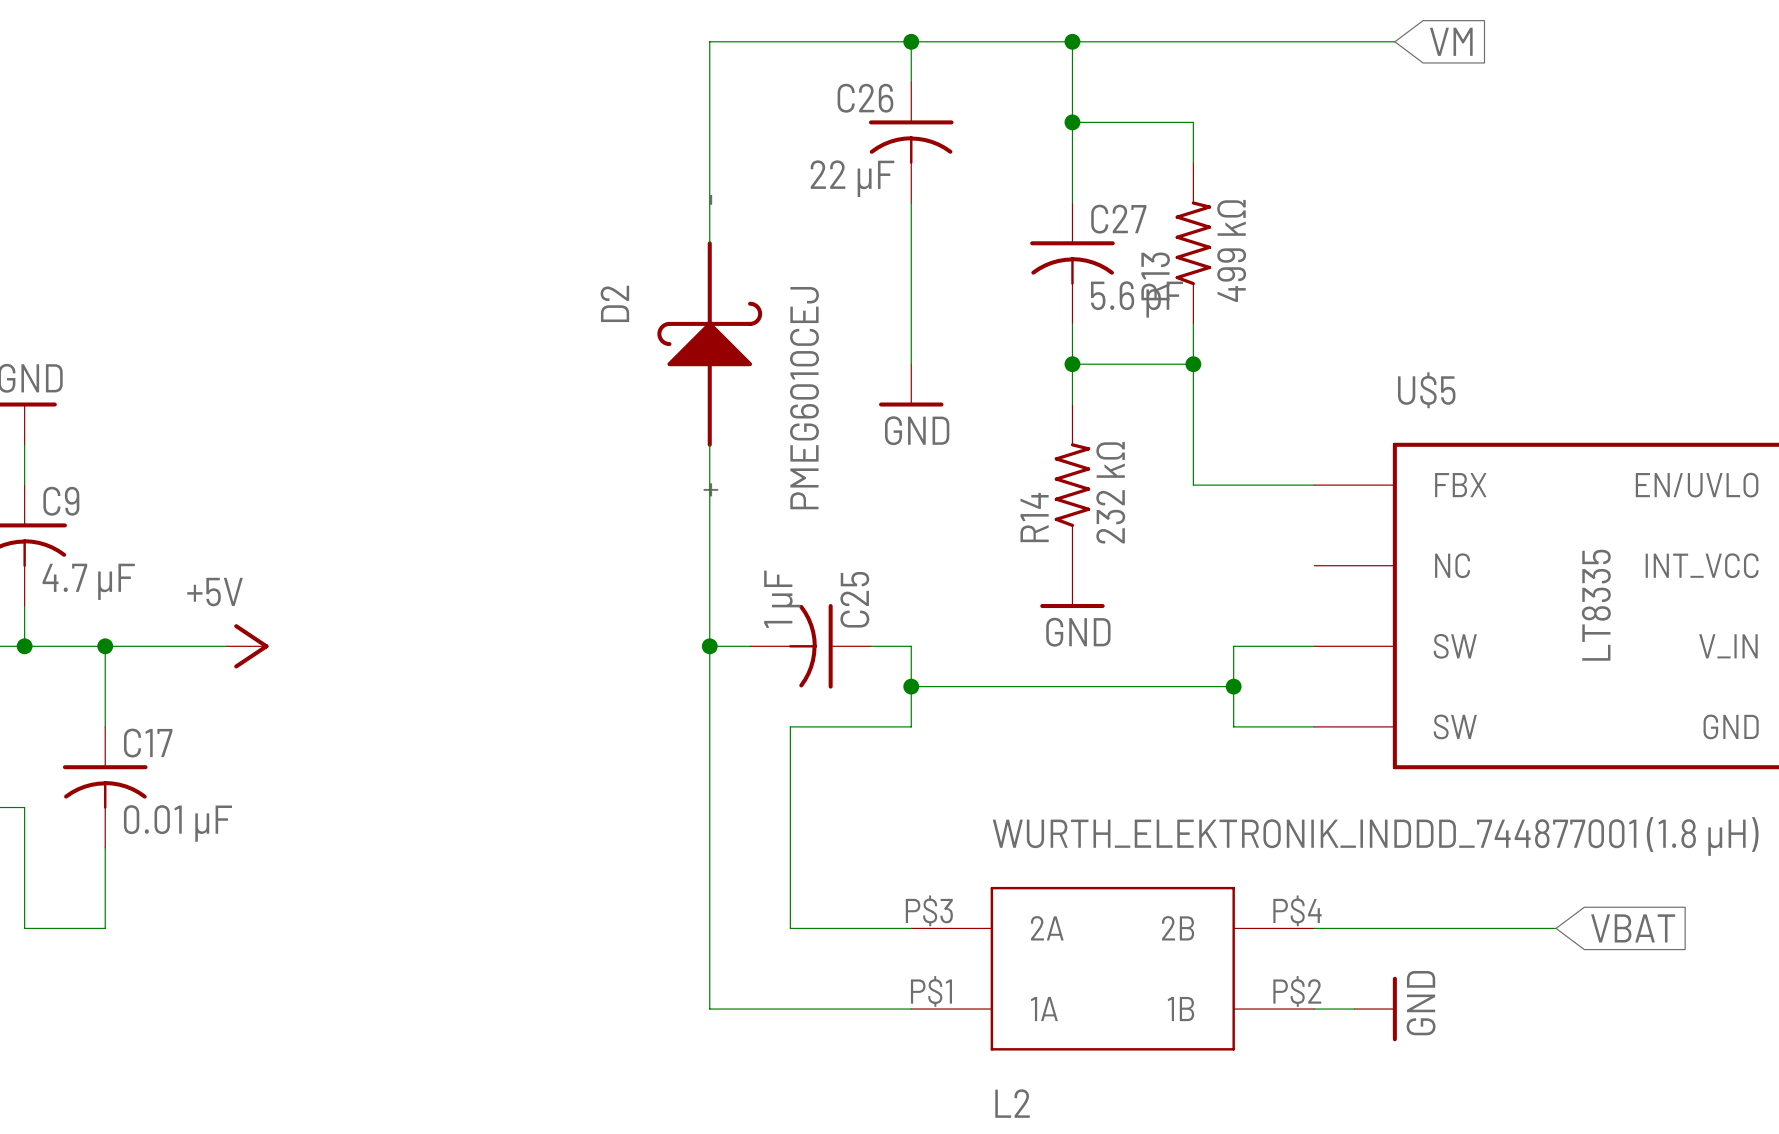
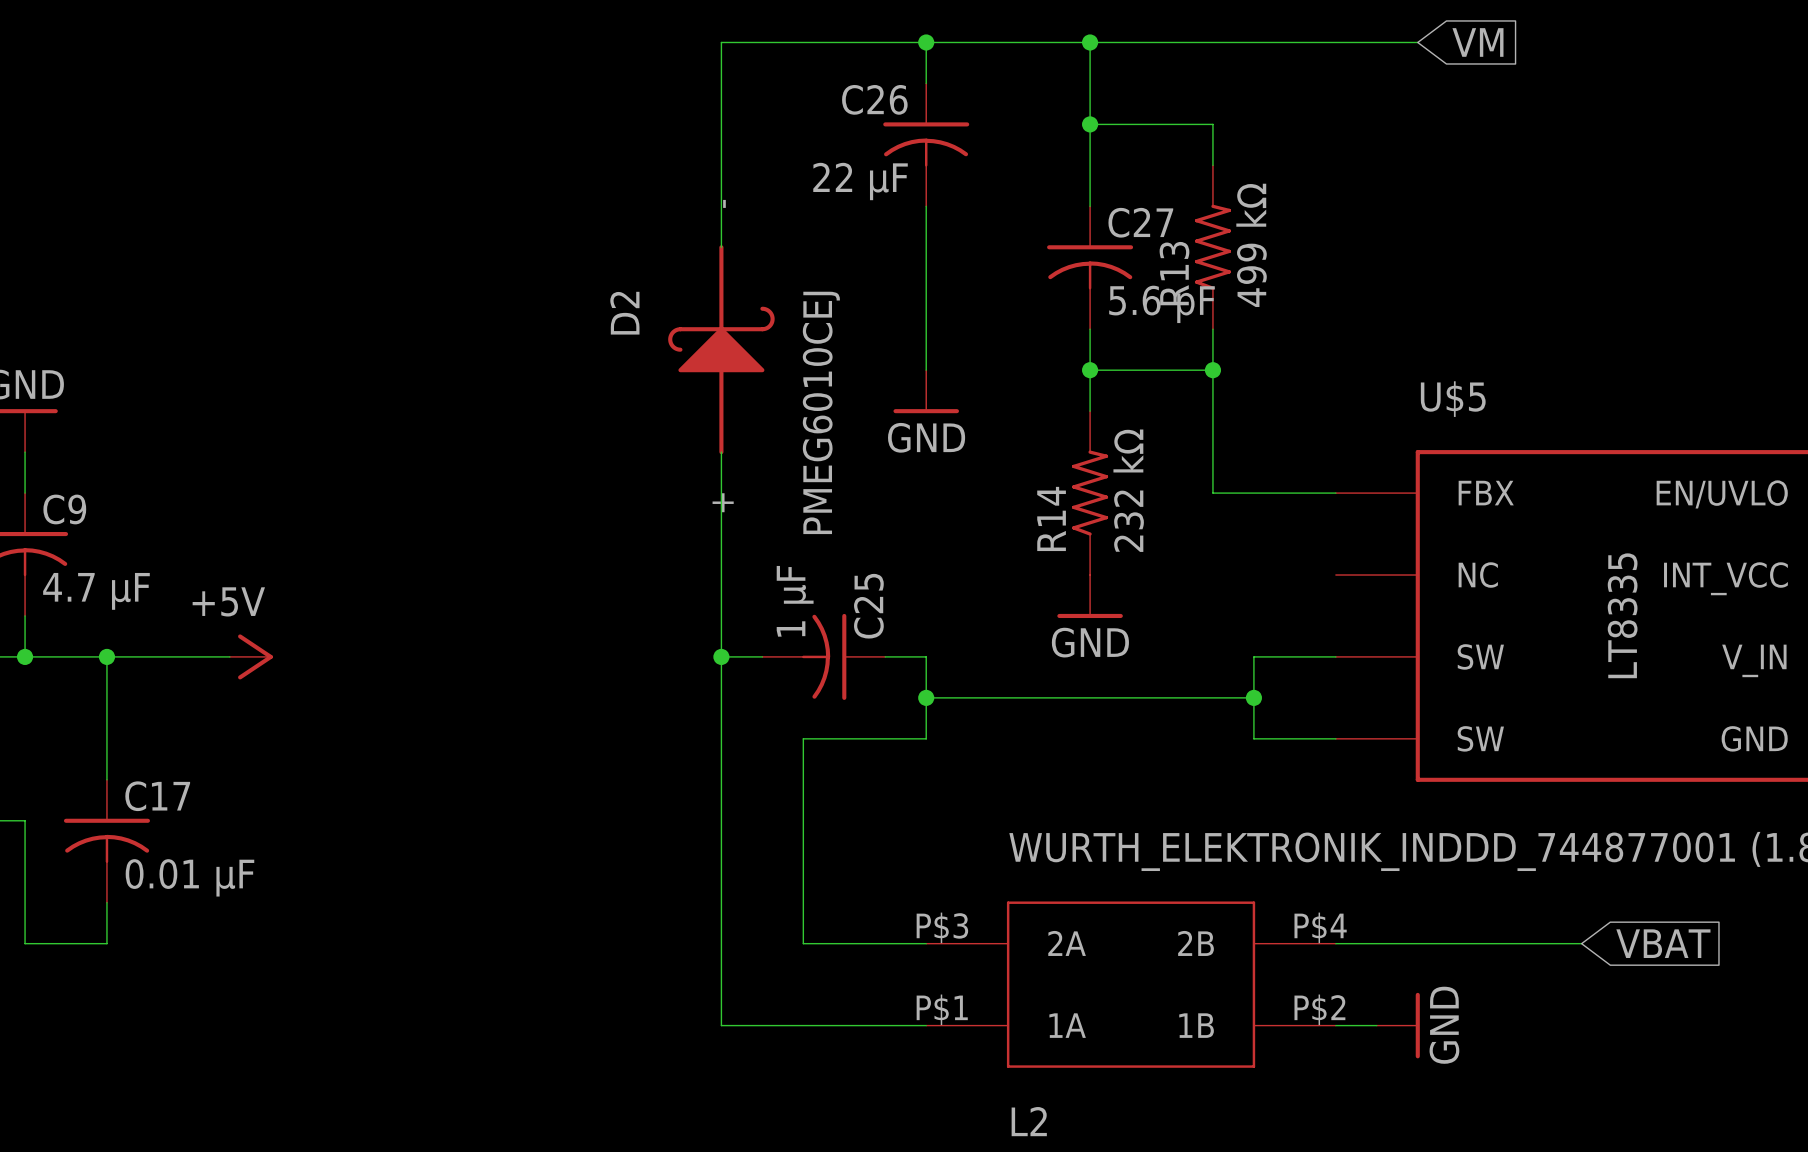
C17 position: (105, 787) -> (106, 841)

